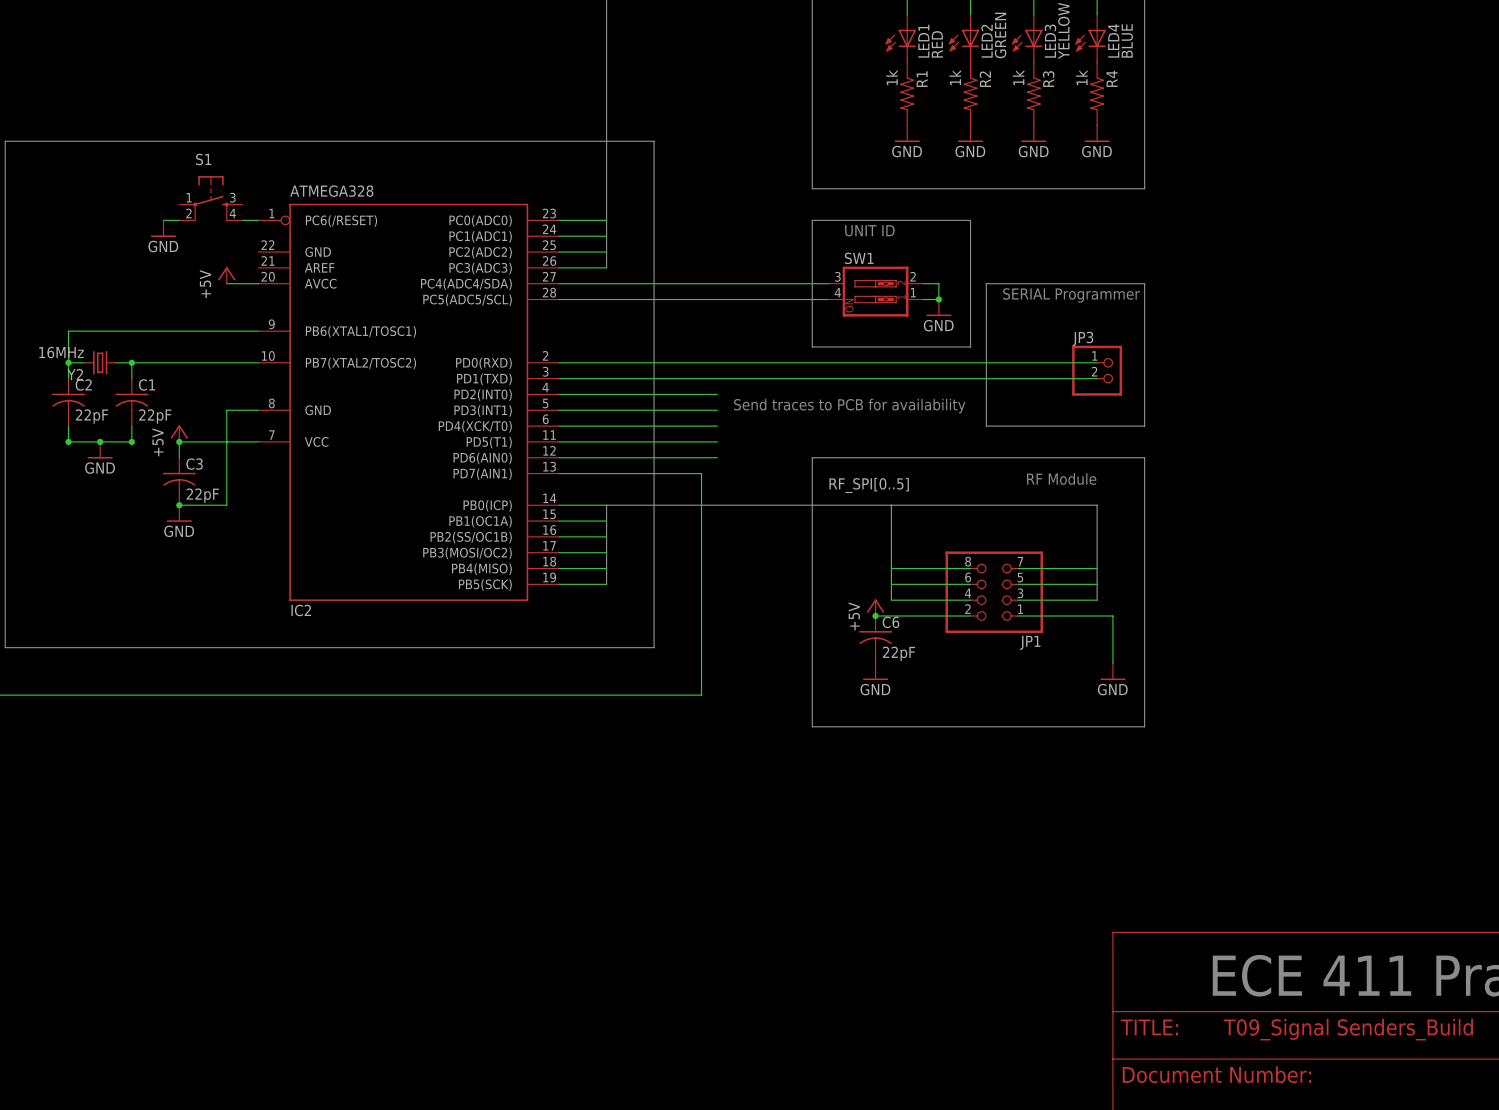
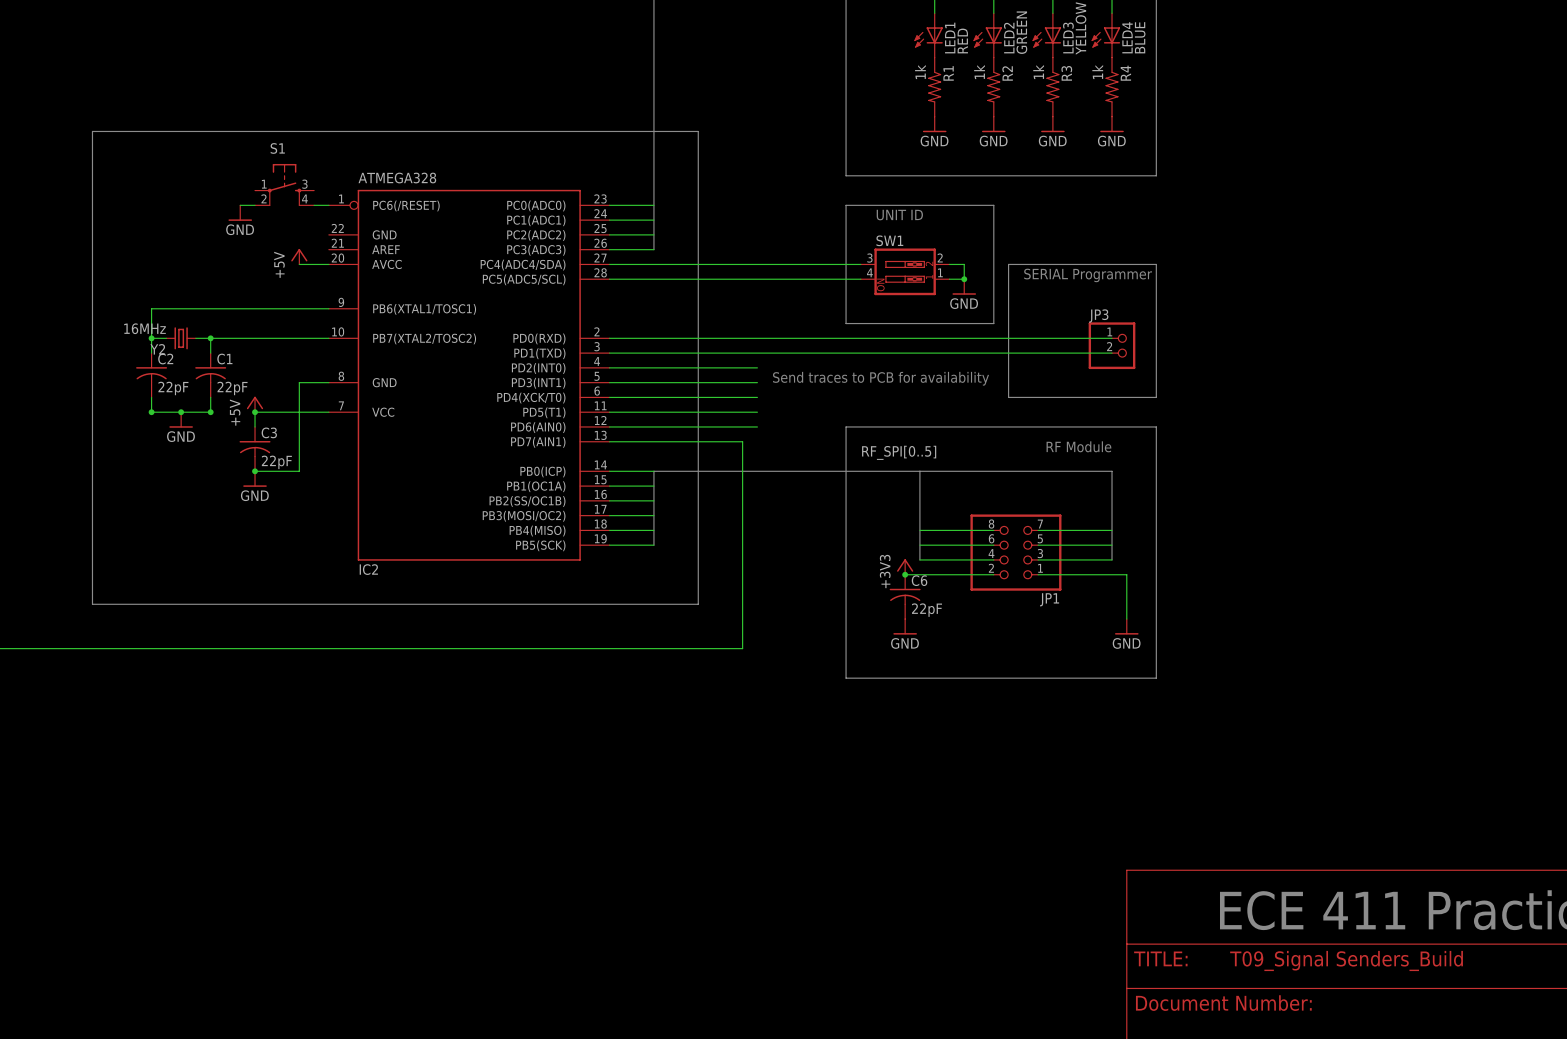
power symbol: +5V (875, 607) -> +3V3 (905, 566)

